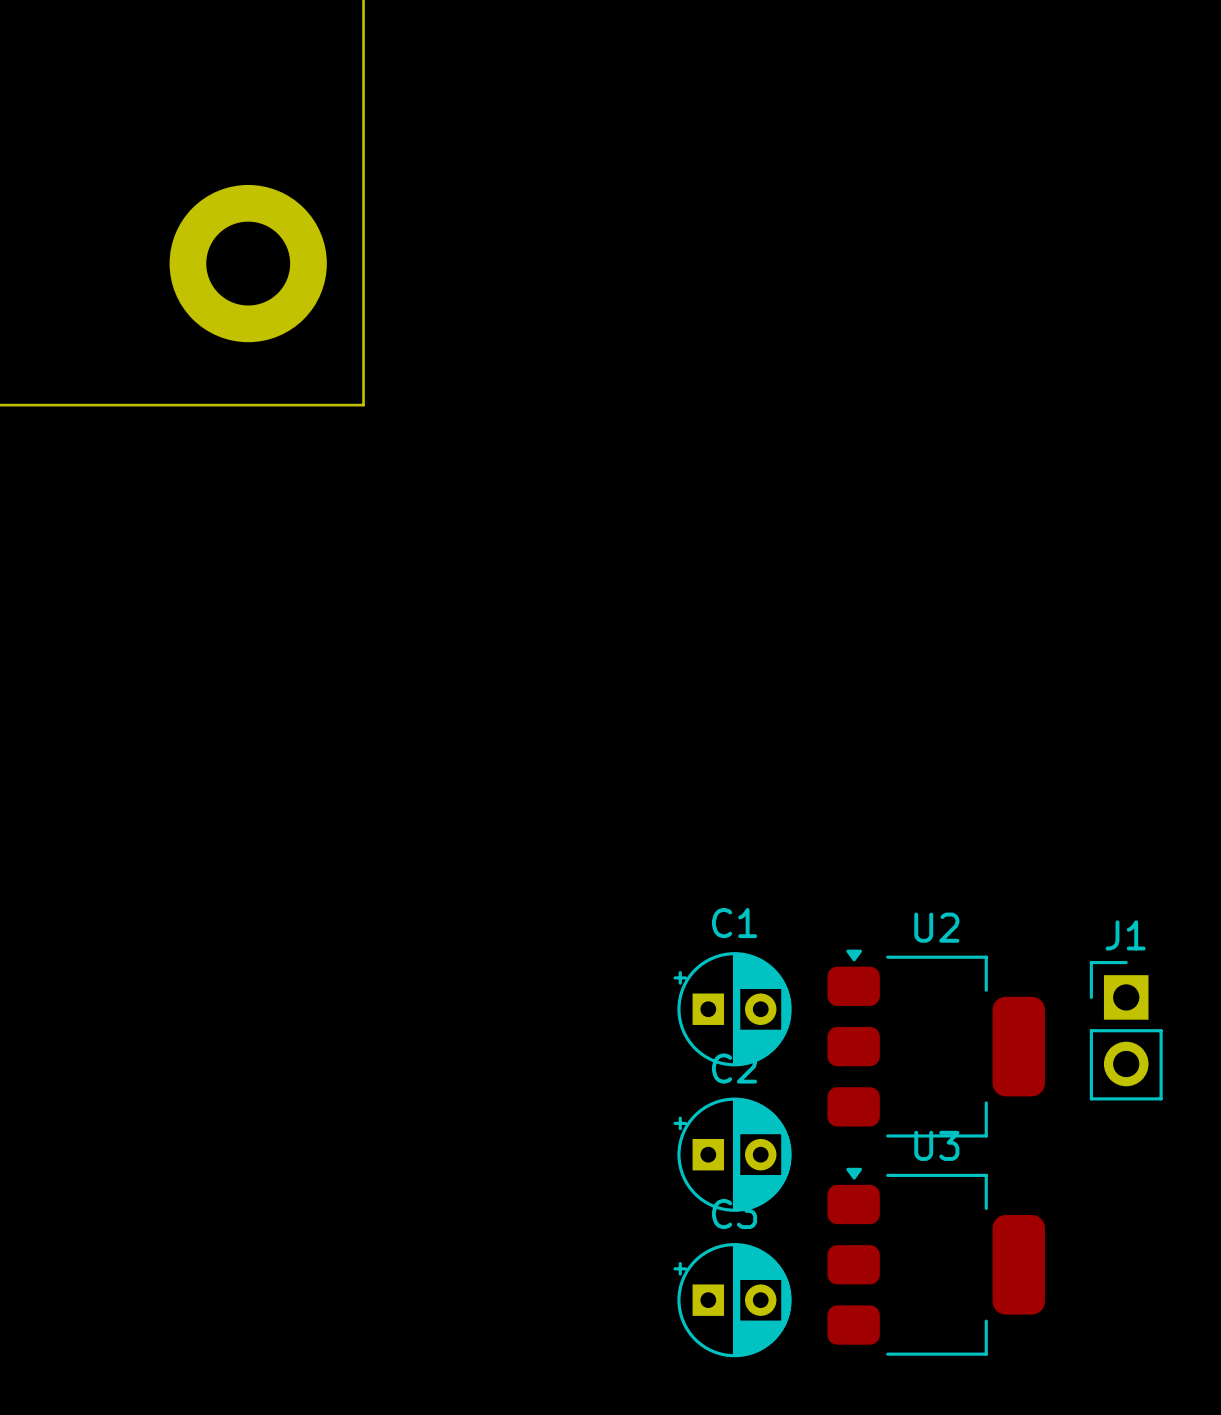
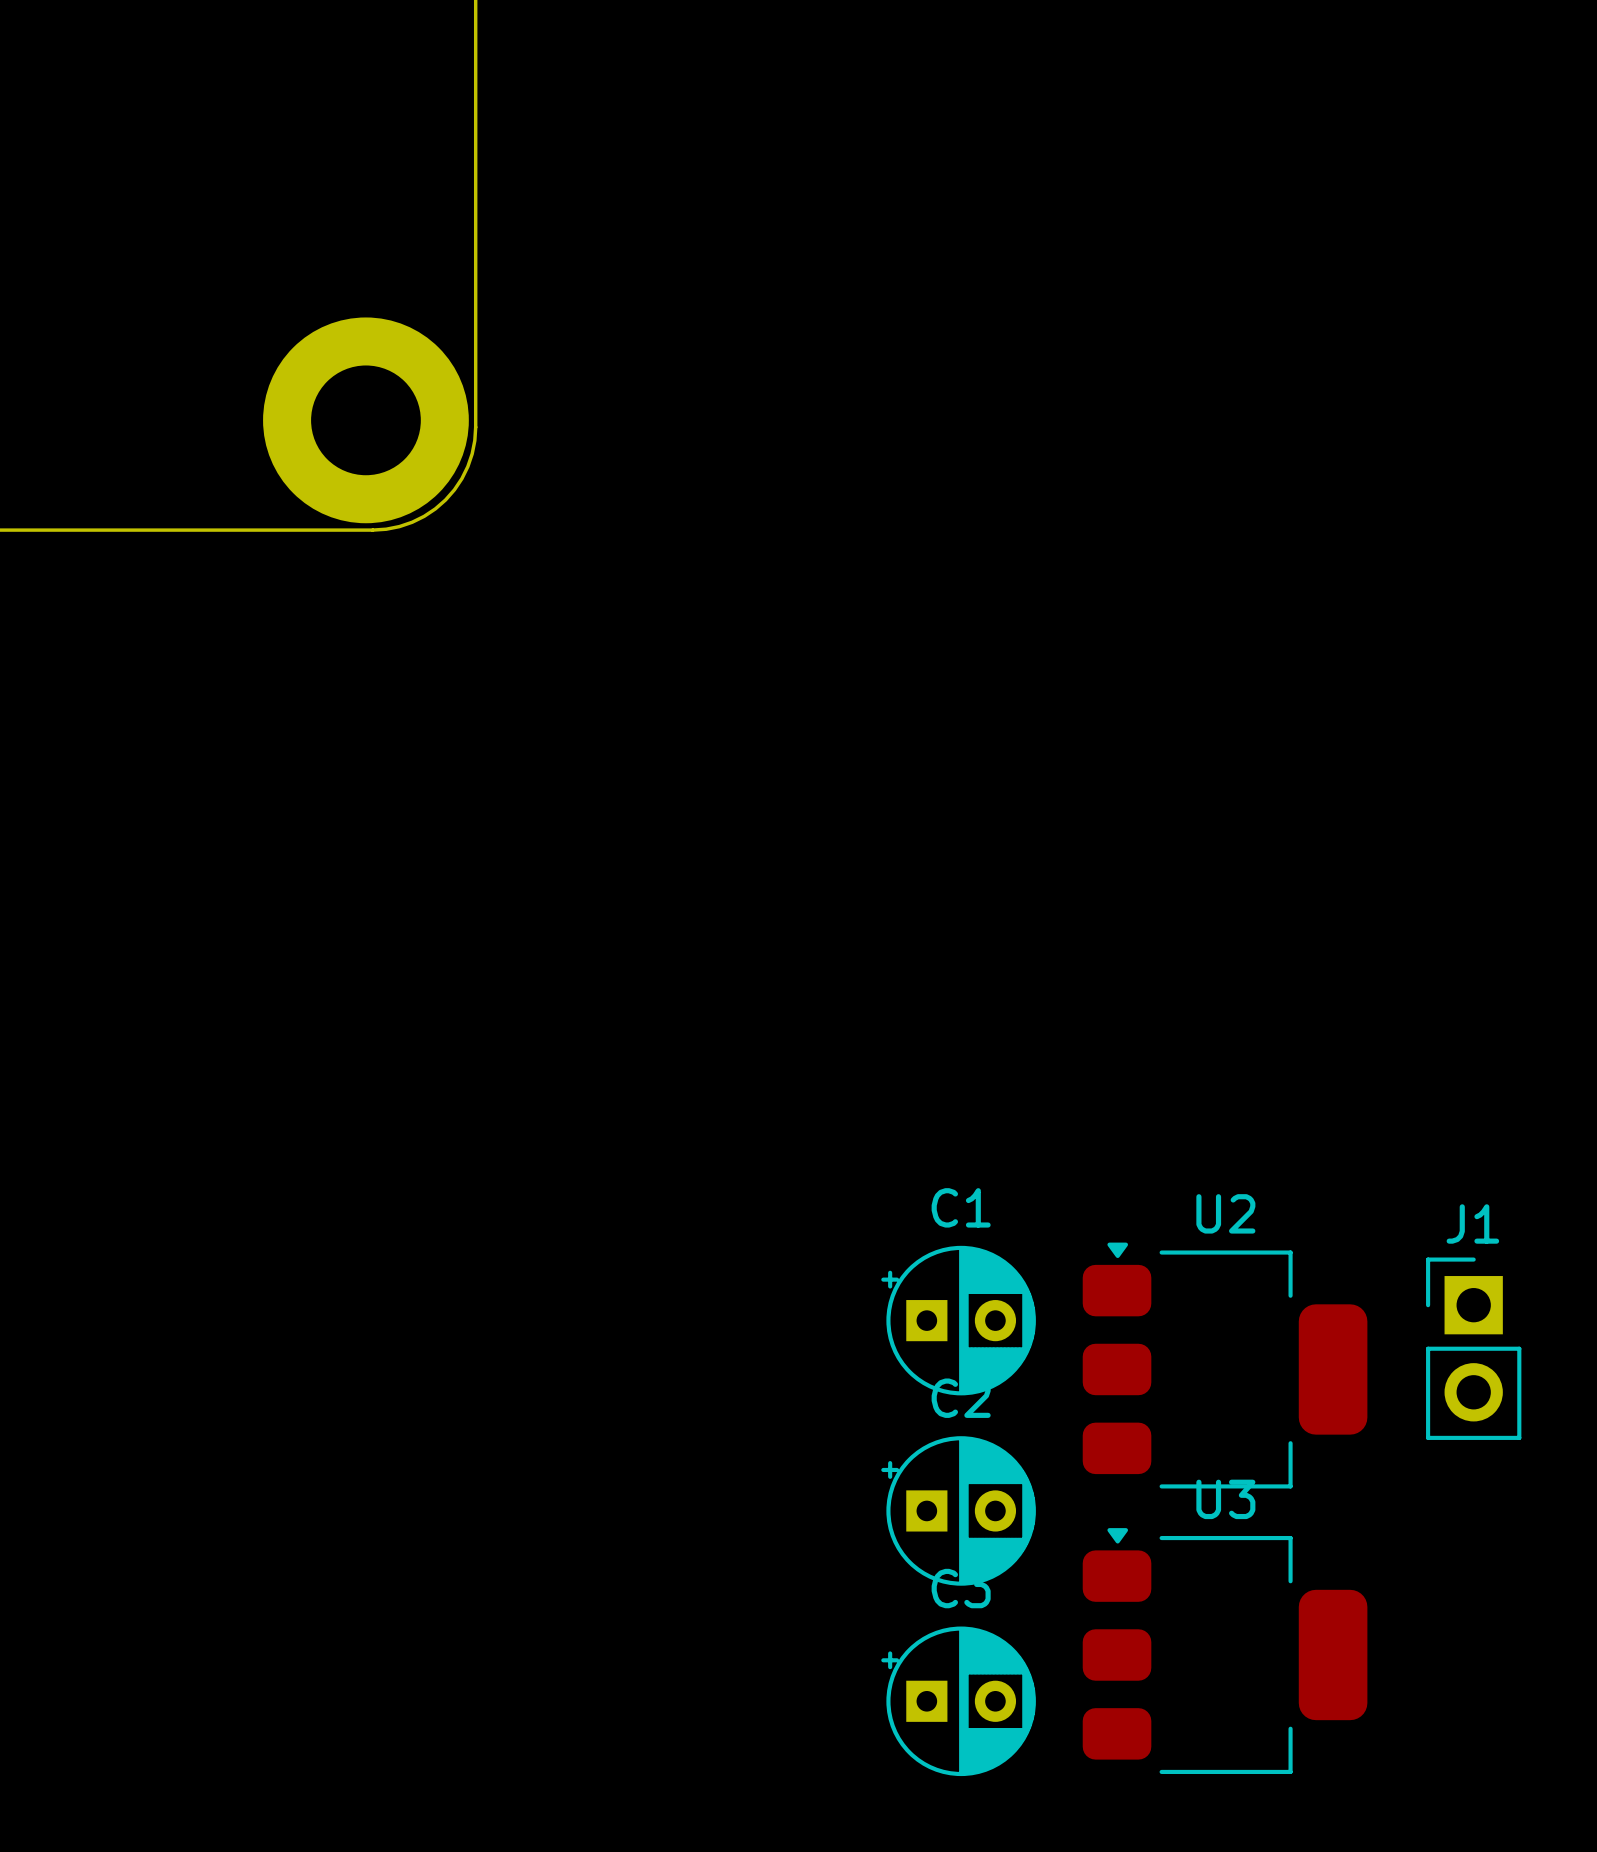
part position: (248, 263) -> (365, 420)
board edge: (363, 326) (363, 405) (284, 405) -> (475, 427) (474, 440) (467, 466) (454, 489) (445, 499) (424, 516) (412, 522) (386, 529) (372, 530)

